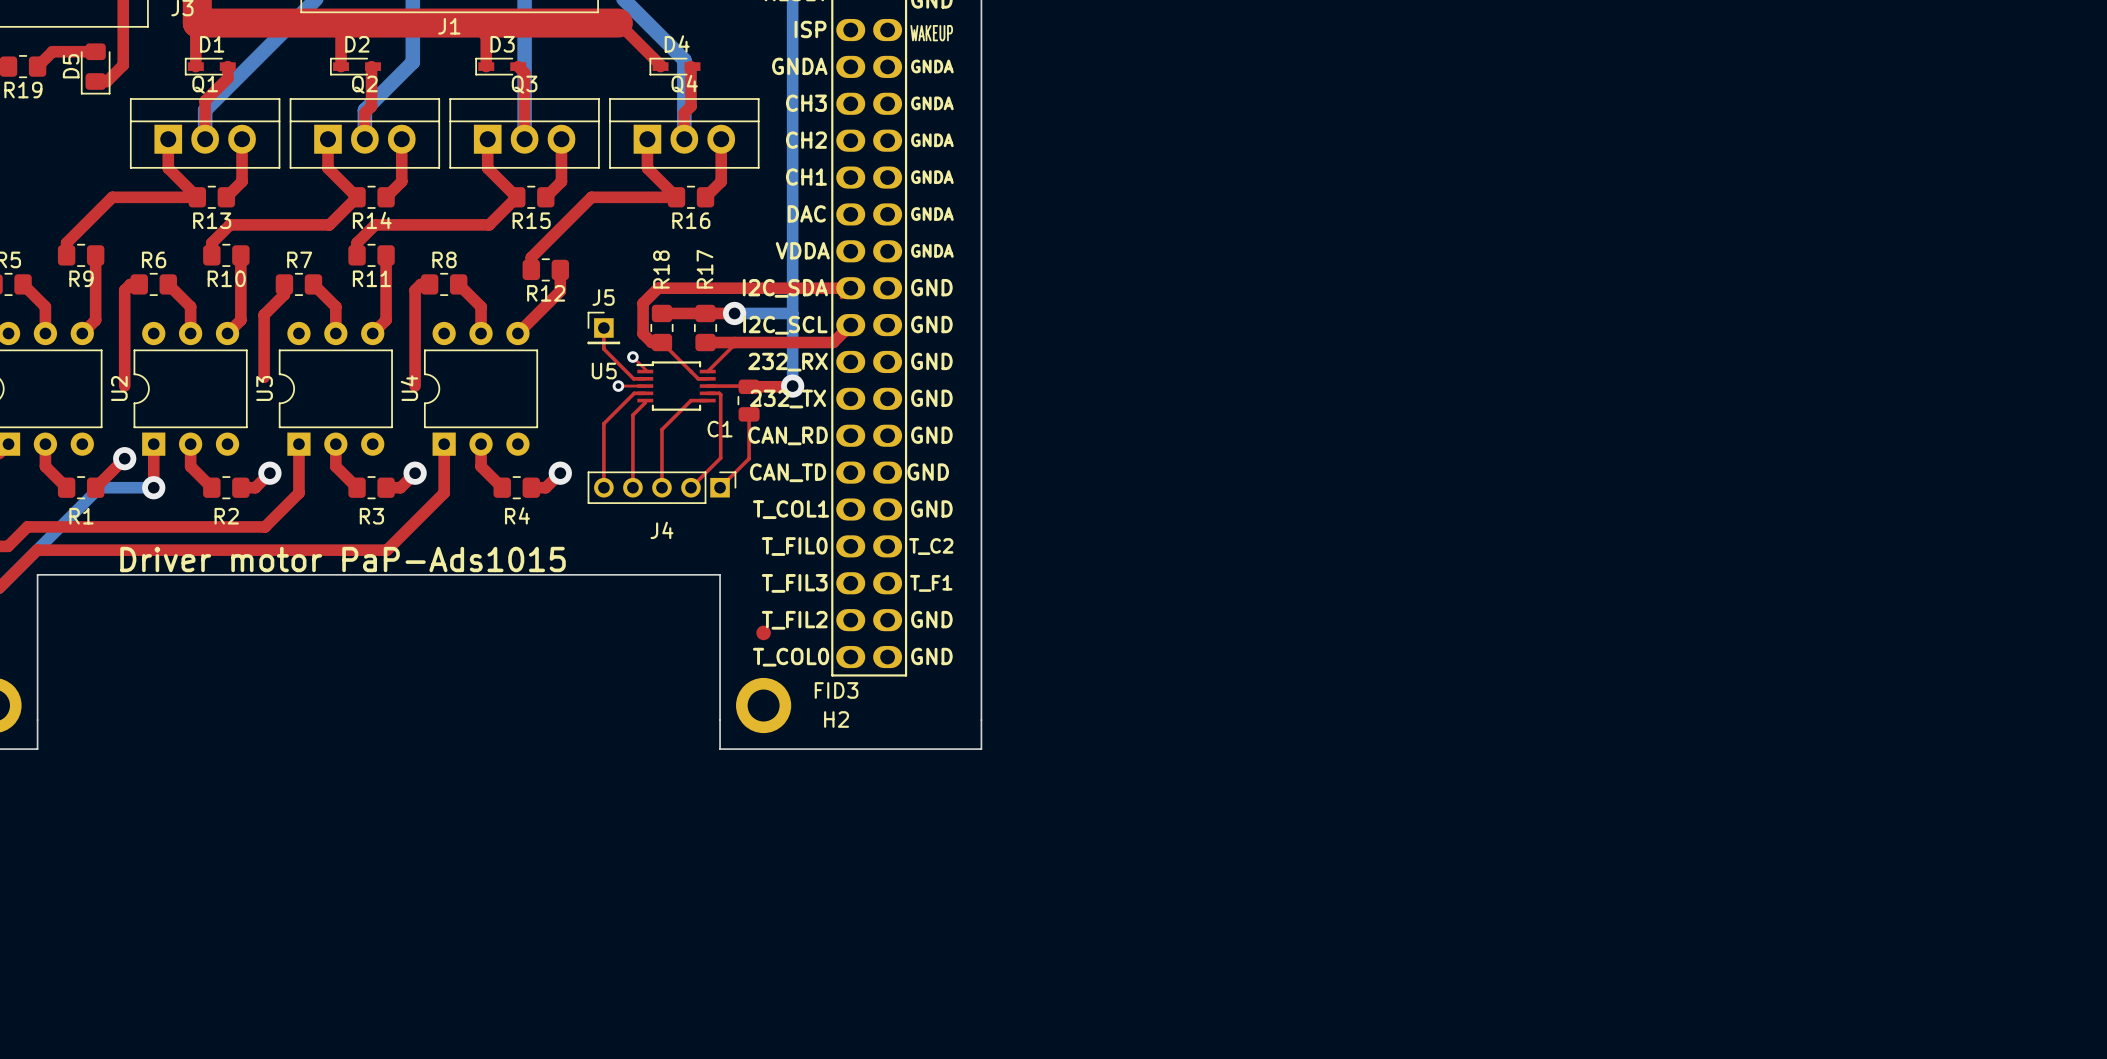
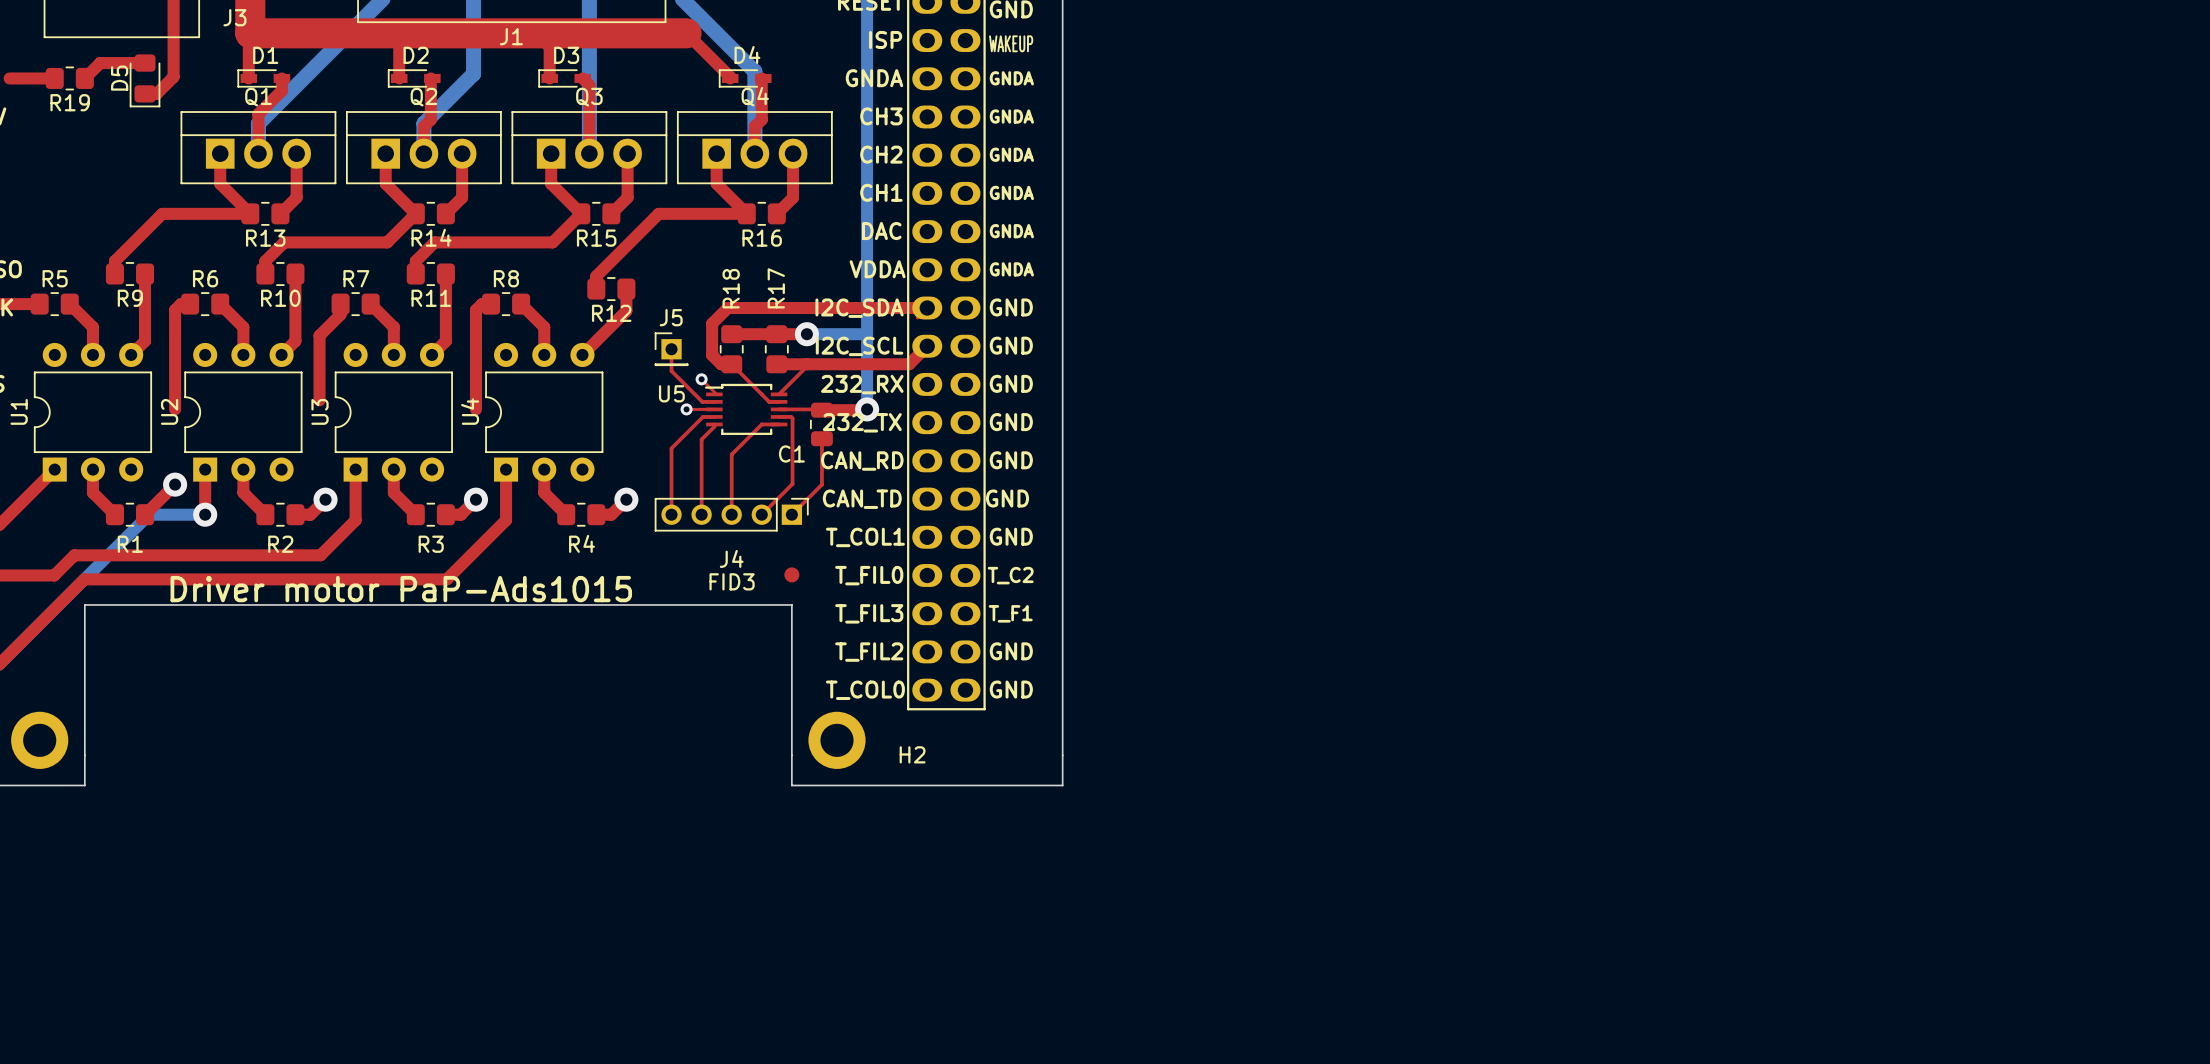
FID3 position: (763, 632) -> (791, 574)
FID3 name position: FID3 (836, 690) -> FID3 (732, 581)

